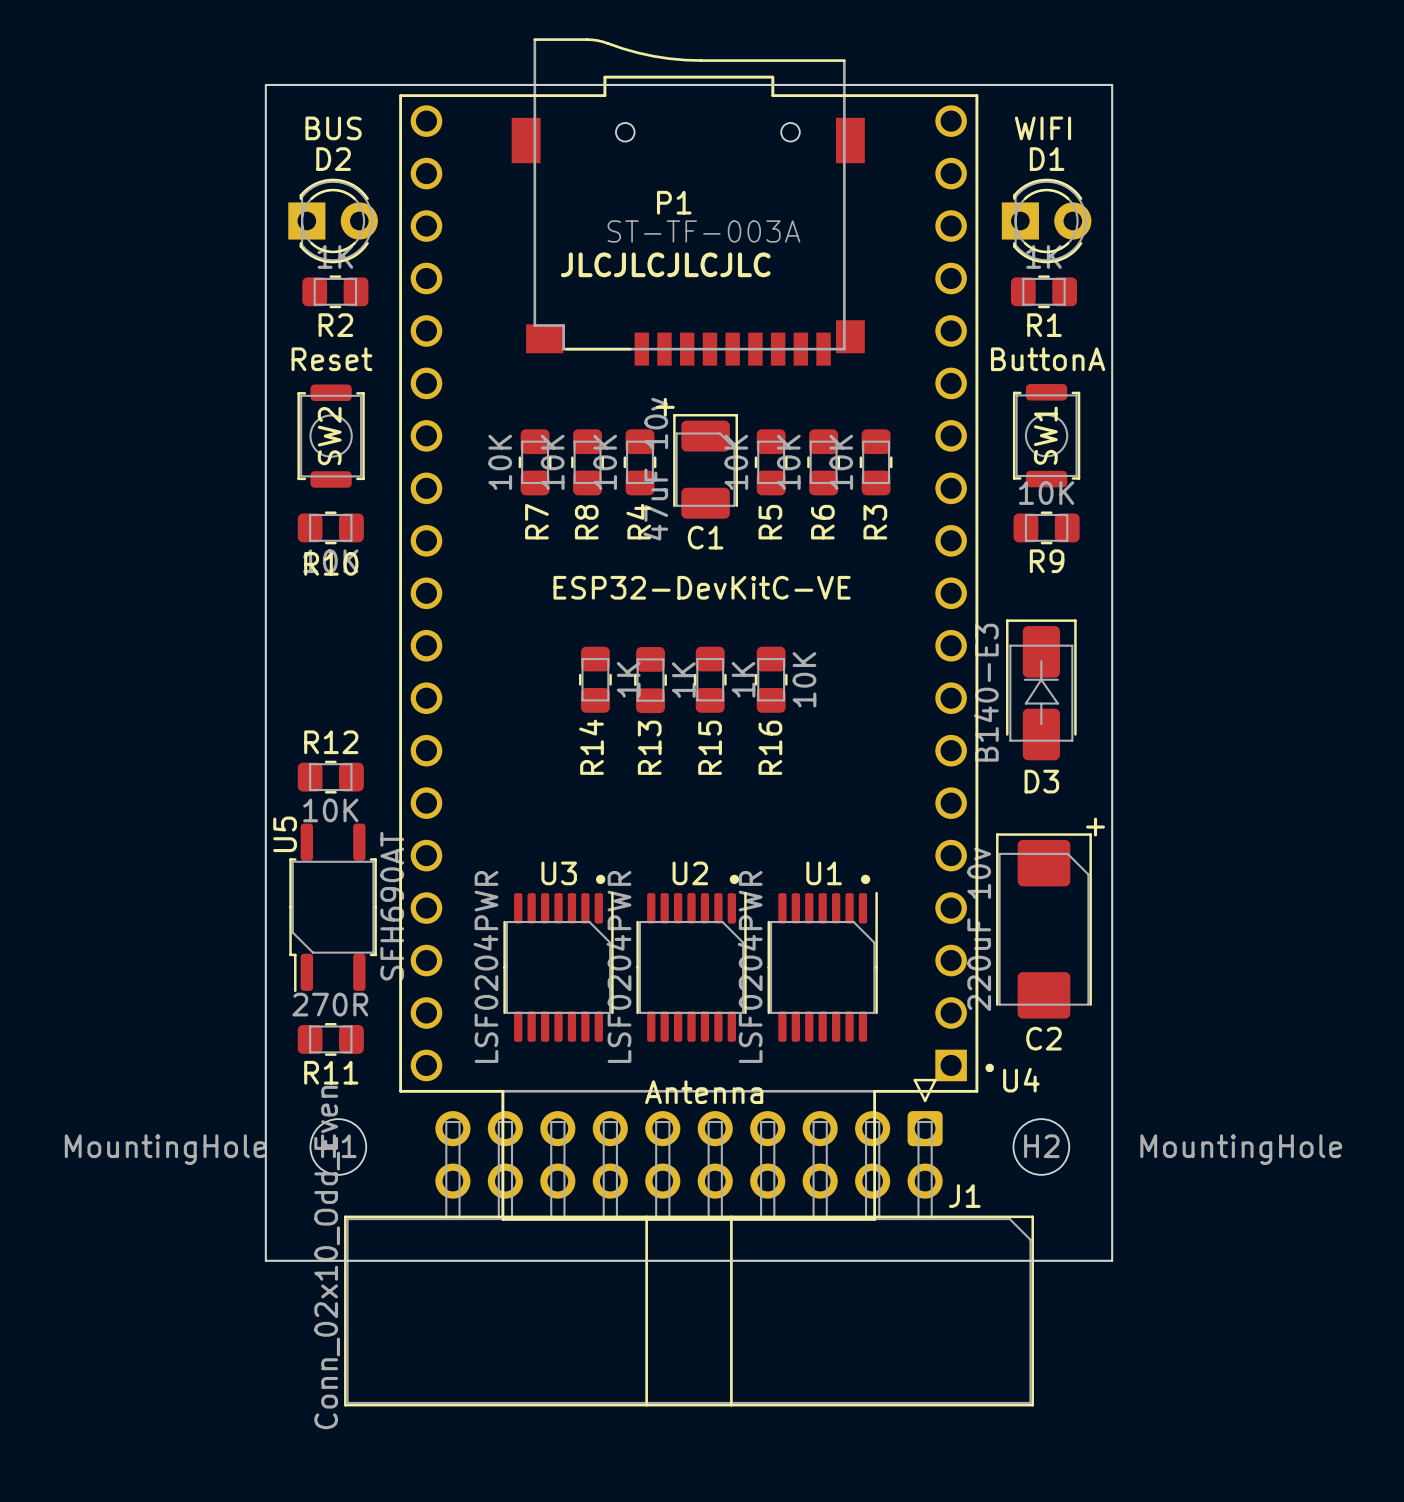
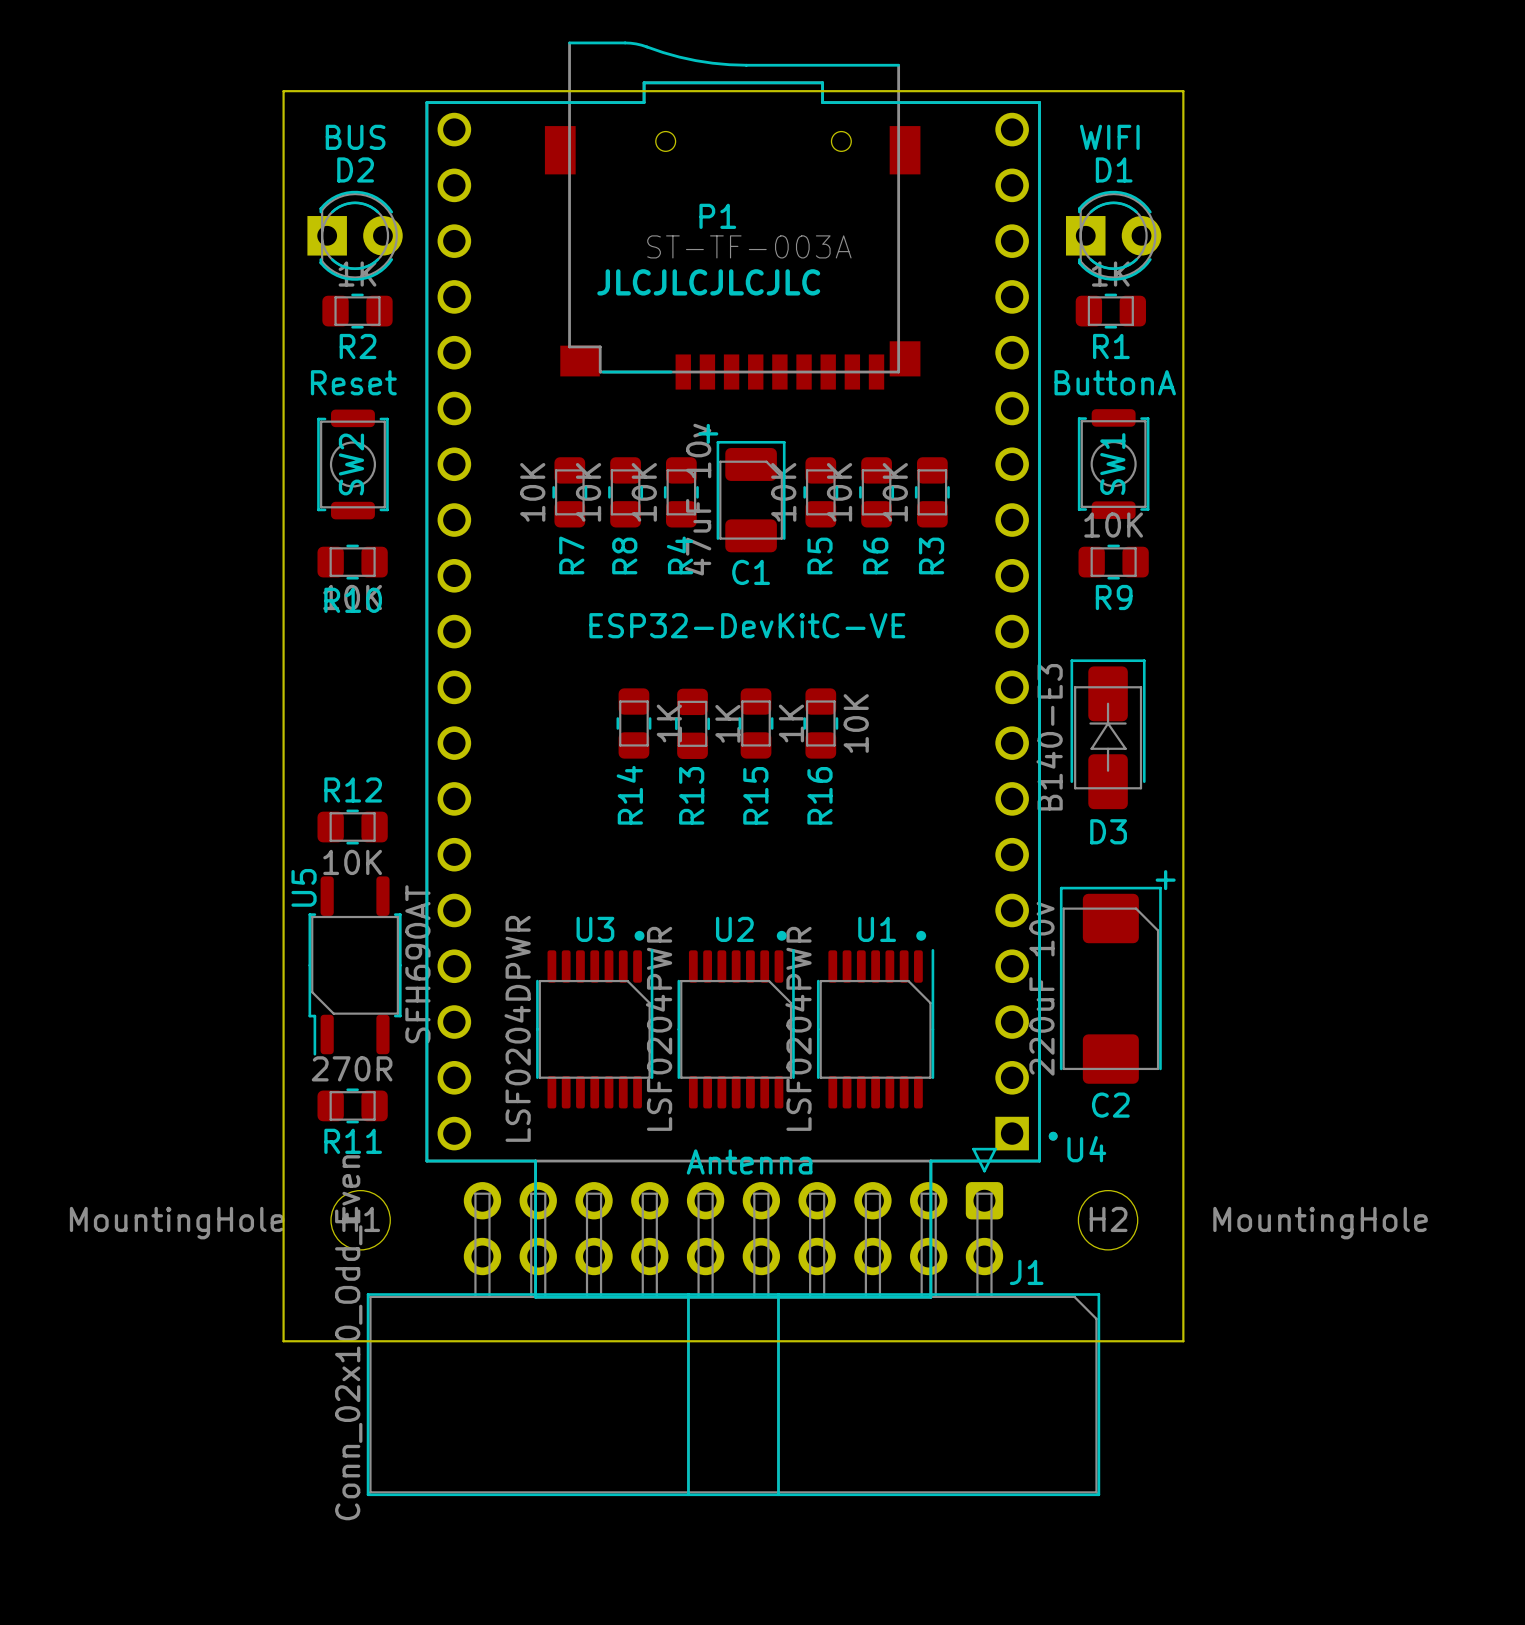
U3 value: LSF0204PWR (485, 966) -> LSF0204DPWR (517, 1028)

